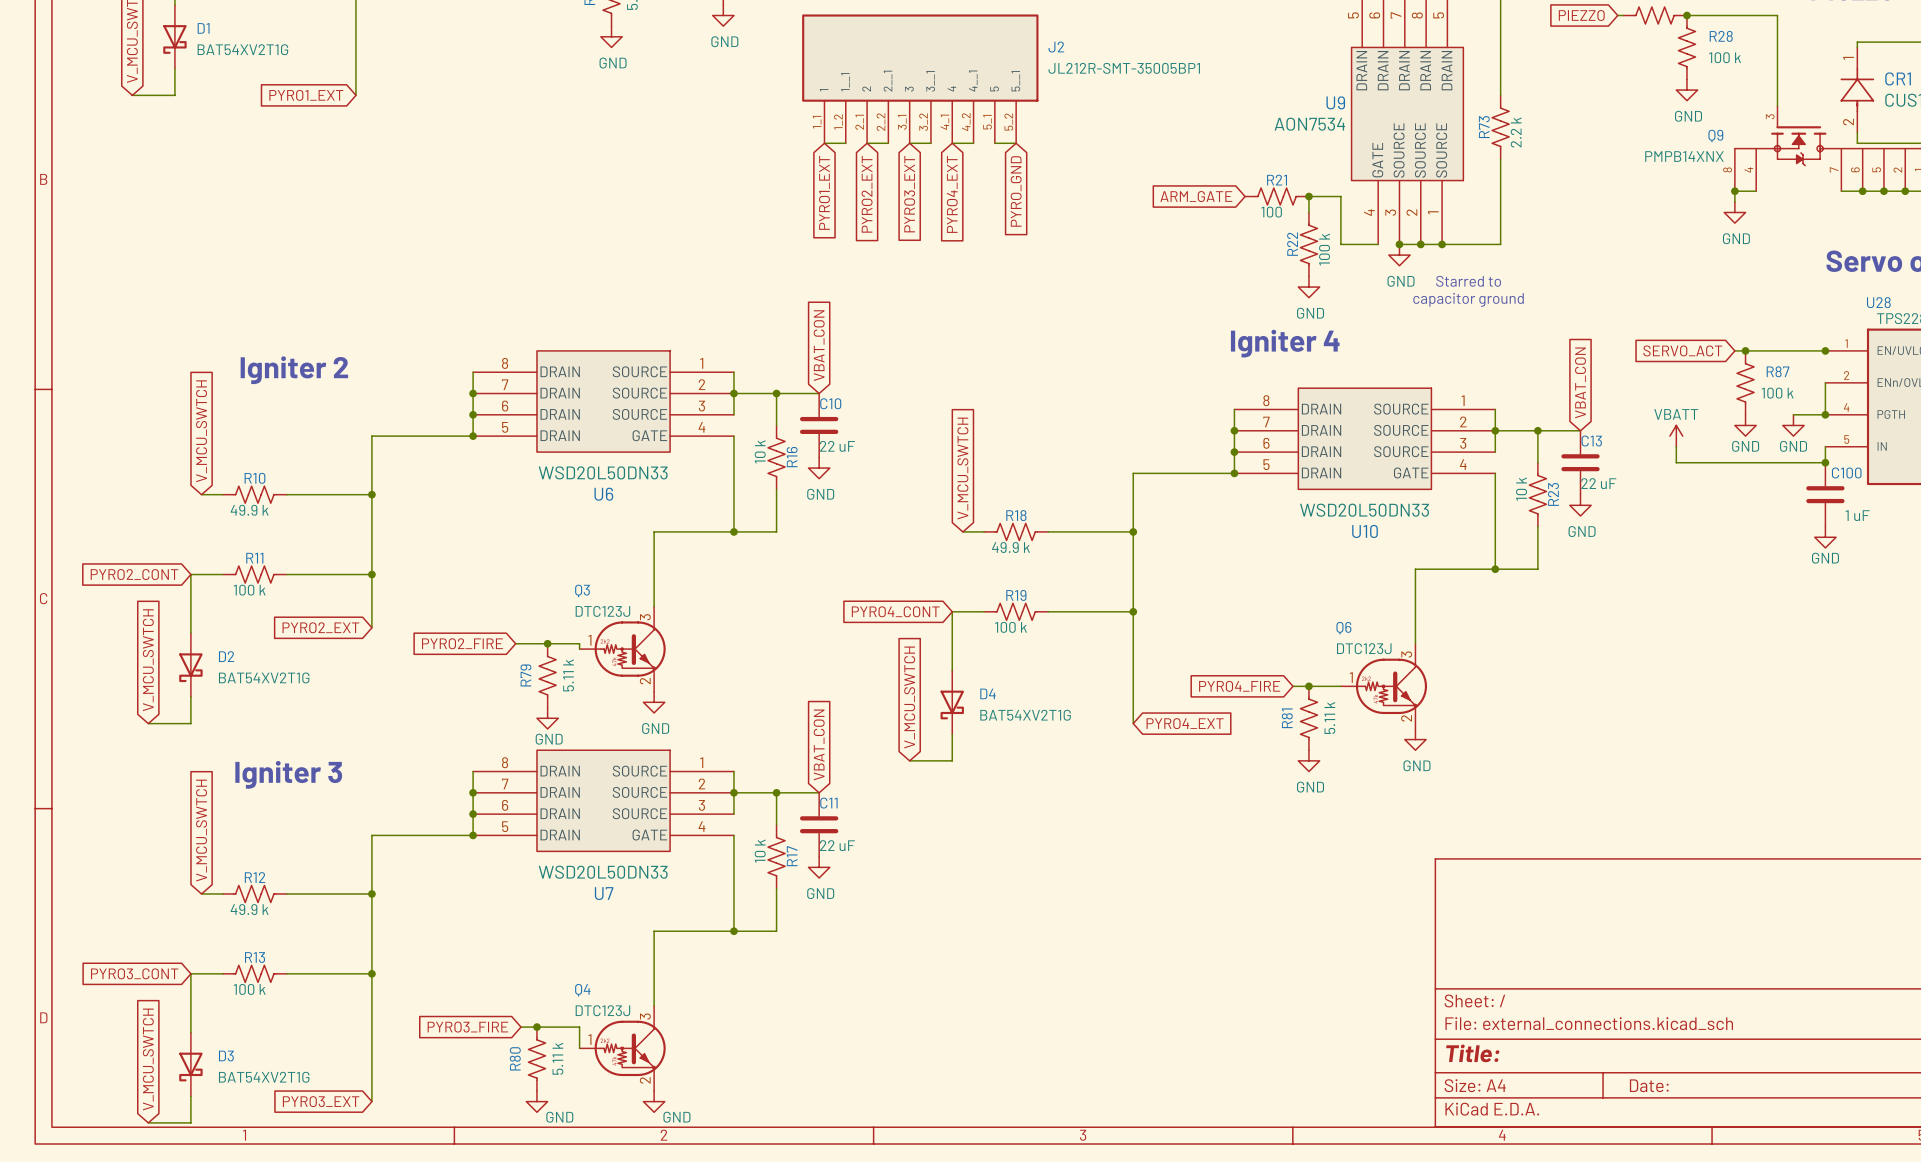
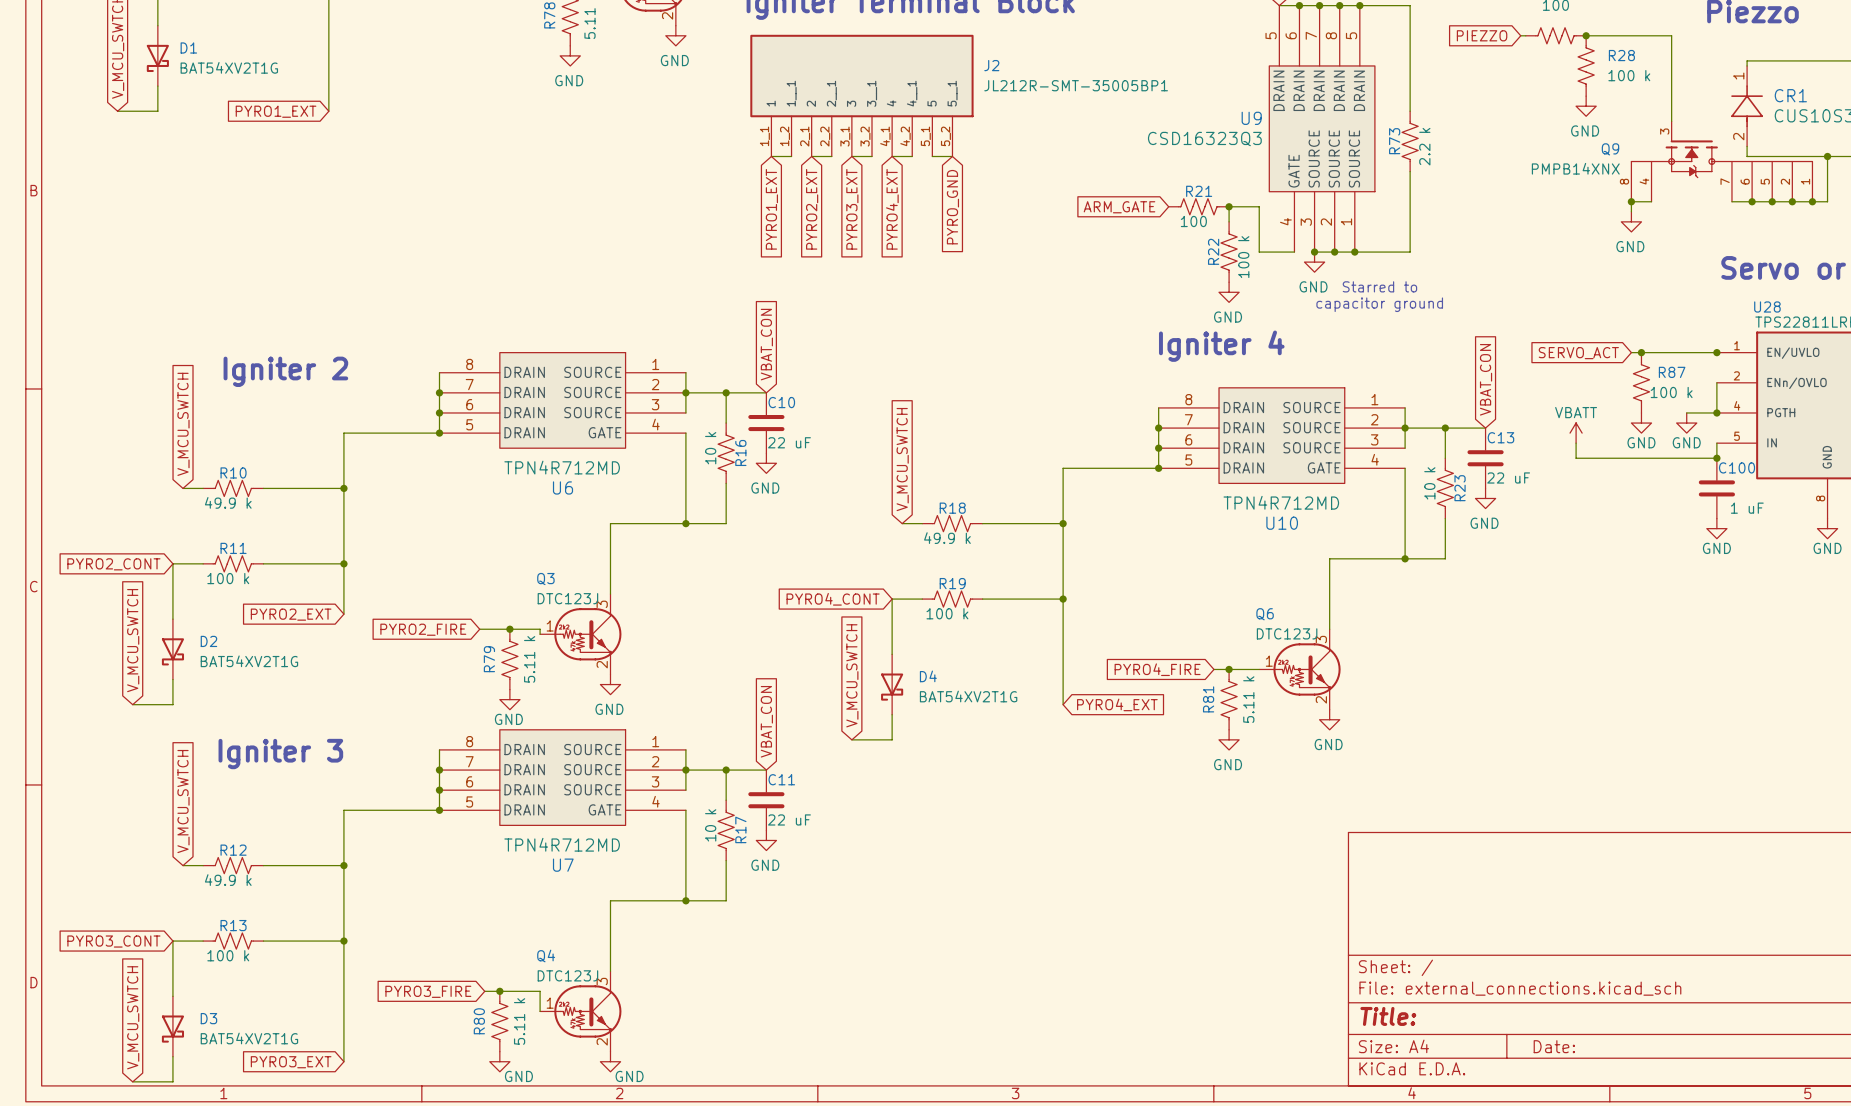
U9 value: AON7534 (1309, 124) -> CSD16323Q3 (1204, 139)
U6 value: WSD20L50DN33 (603, 472) -> TPN4R712MD (562, 467)
U10 value: WSD20L50DN33 (1364, 510) -> TPN4R712MD (1281, 502)
U7 value: WSD20L50DN33 (603, 872) -> TPN4R712MD (562, 844)

